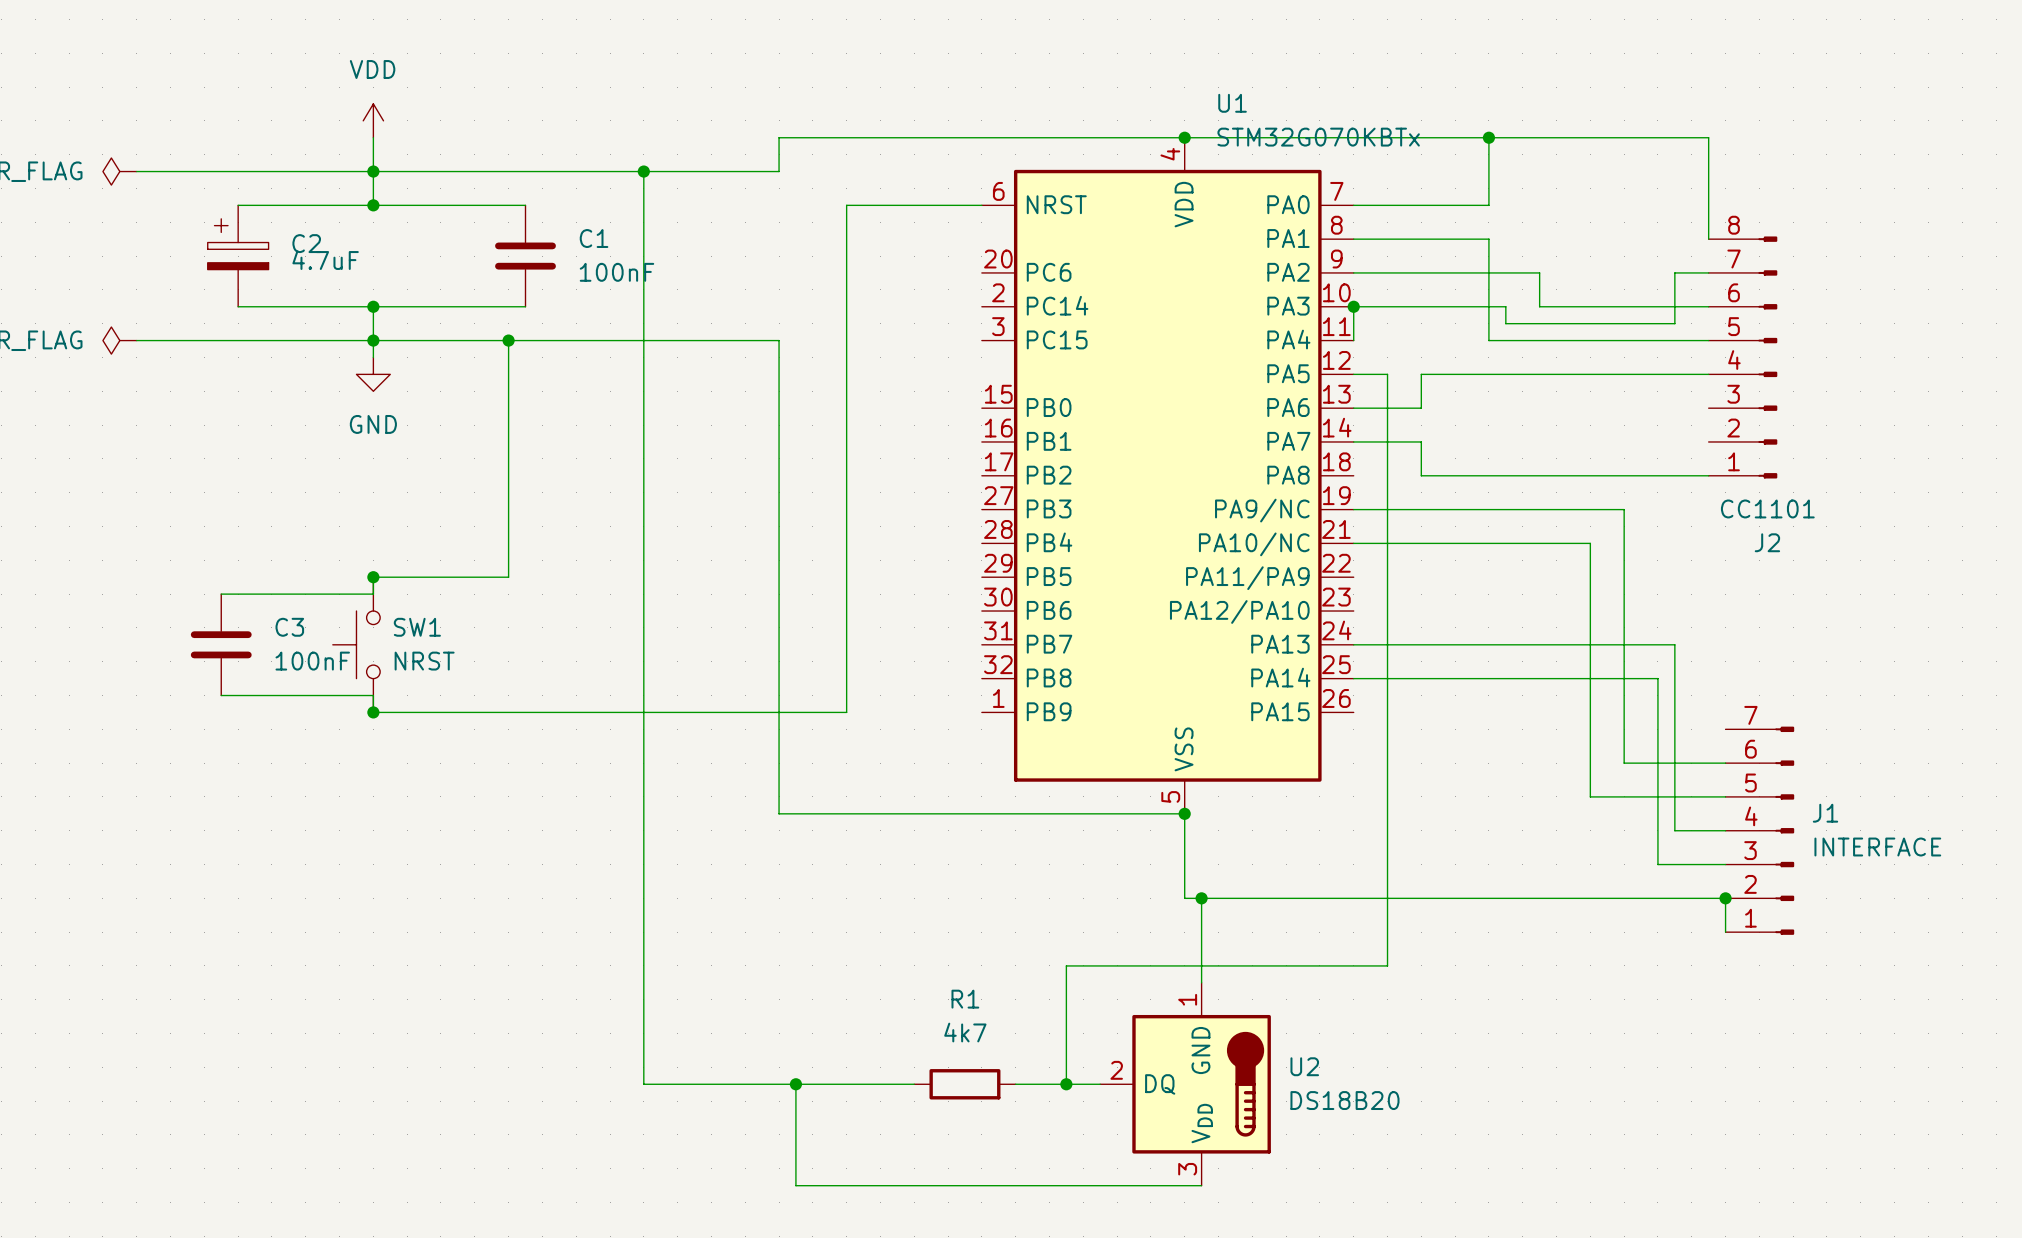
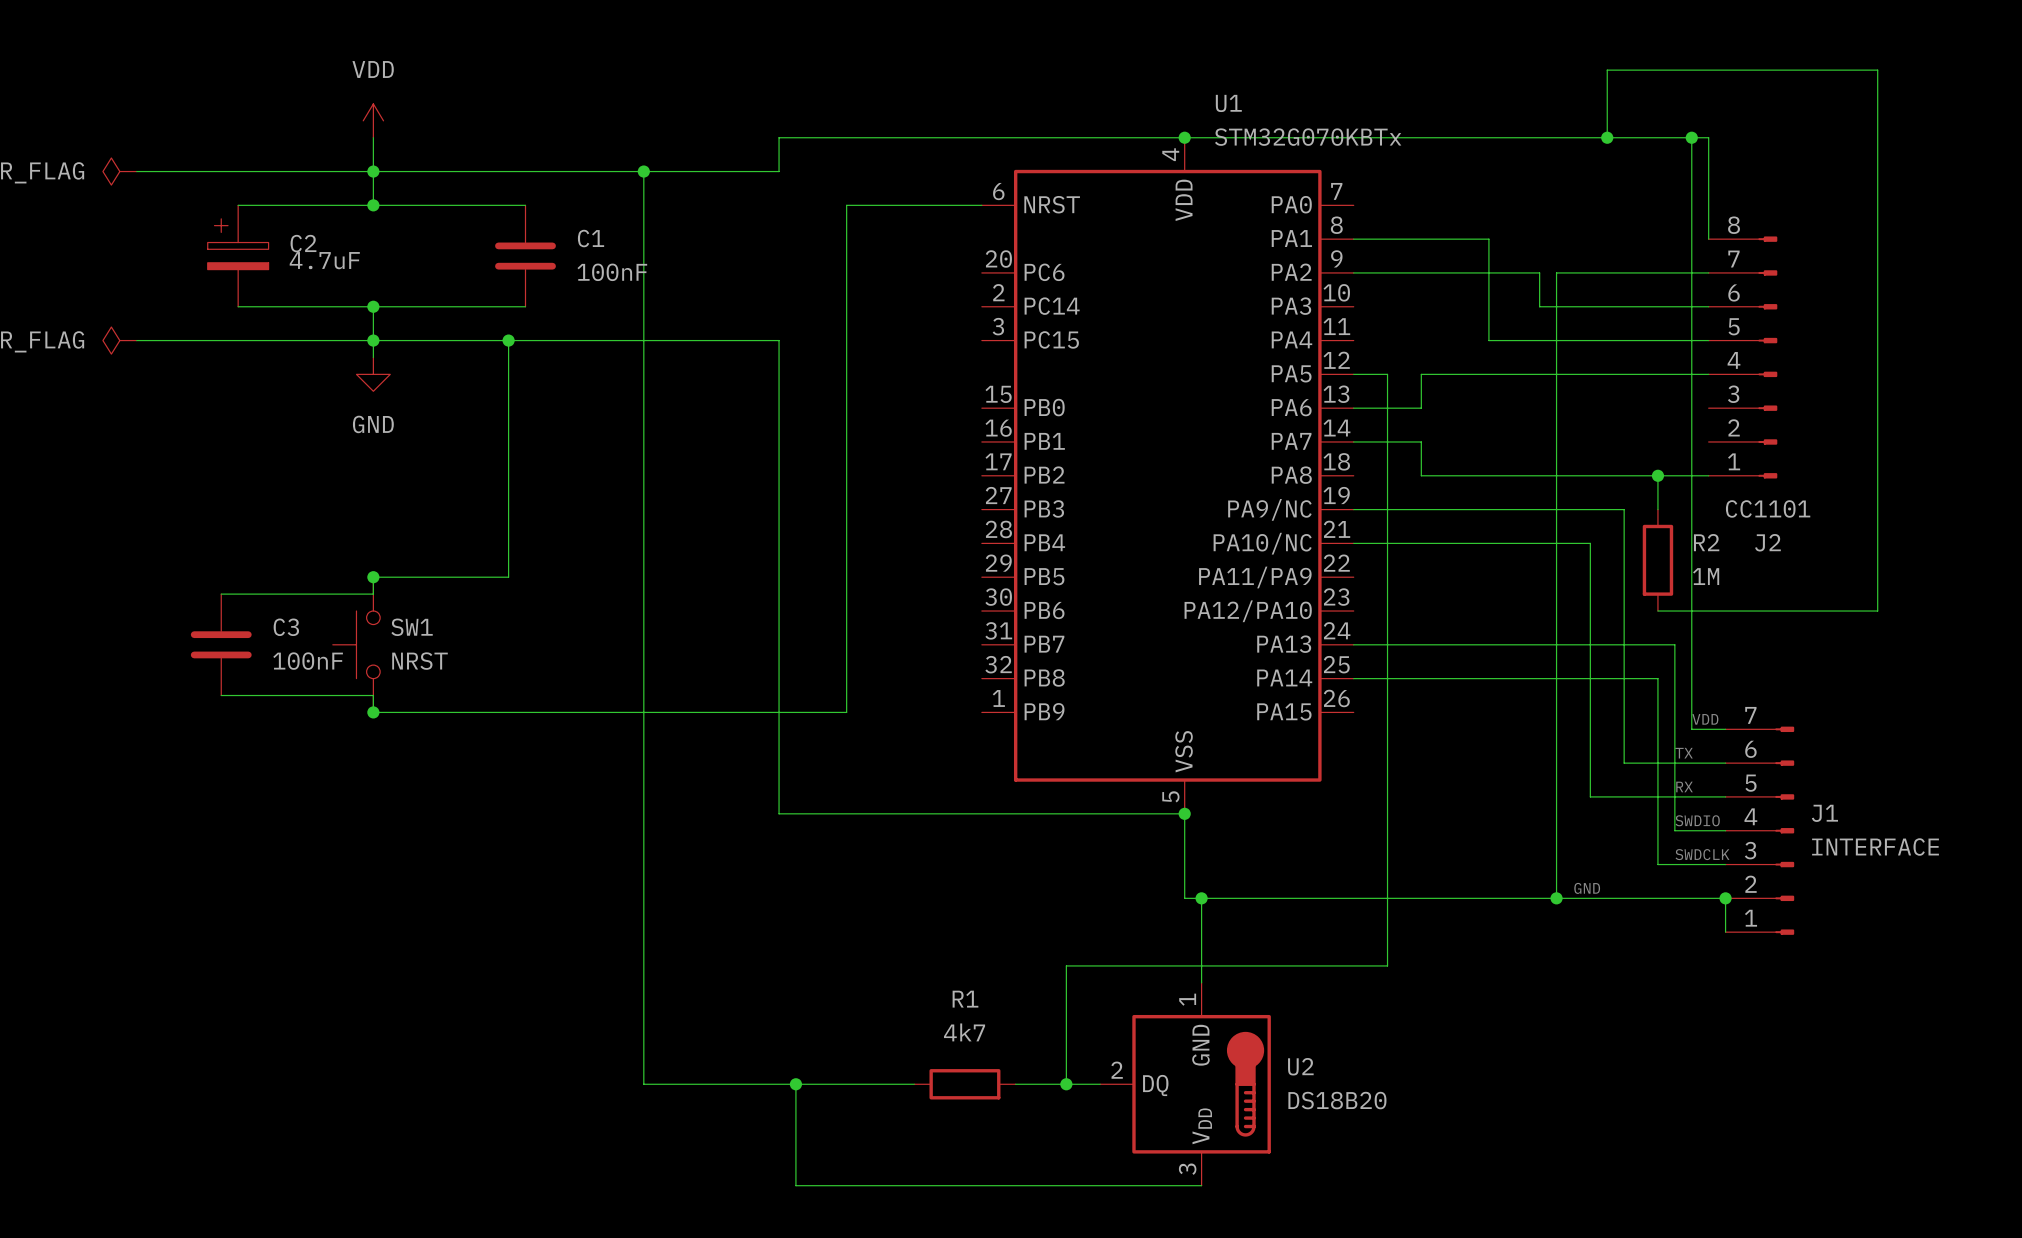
wire: (1488, 137) (1488, 205) (1353, 205) -> none
junction: (1488, 137) -> none
wire: none -> (1607, 137) (1607, 70) (1877, 70) (1877, 611) (1657, 611)
junction: none -> (1607, 137)
wire: none -> (1691, 137) (1691, 729) (1725, 729)
junction: none -> (1691, 137)
wire: (1674, 272) (1674, 323) (1505, 323) (1505, 306) (1353, 306) (1353, 340) -> (1674, 272) (1556, 272) (1556, 898)
junction: (1353, 306) -> none
wire: none -> (1657, 475) (1657, 509)
junction: none -> (1657, 475)
R2: none -> 1M (1657, 560)
text: none -> VDD (1705, 719)
text: none -> TX (1684, 753)
text: none -> RX (1684, 786)
text: none -> SWDIO (1697, 820)
text: none -> SWDCLK (1702, 854)
text: none -> GND (1587, 888)
junction: none -> (1556, 898)

